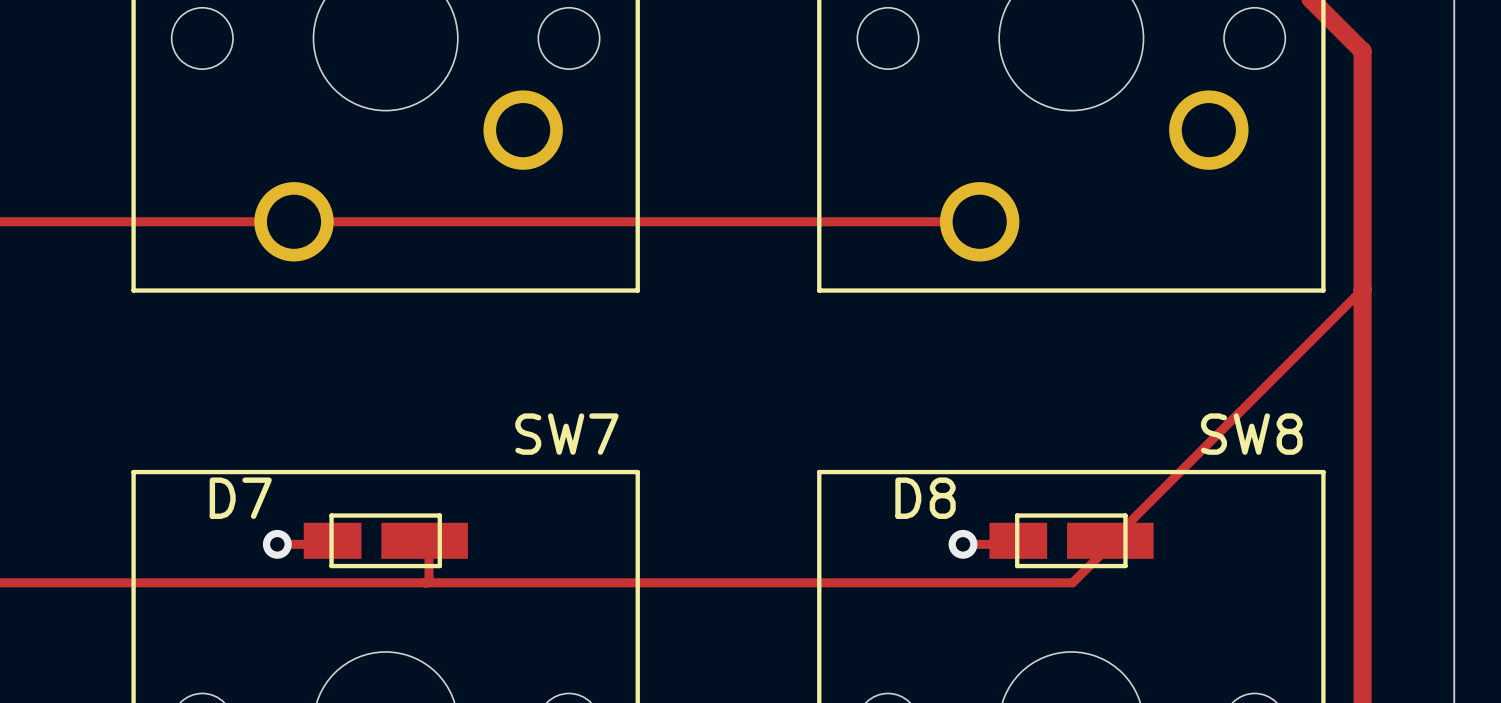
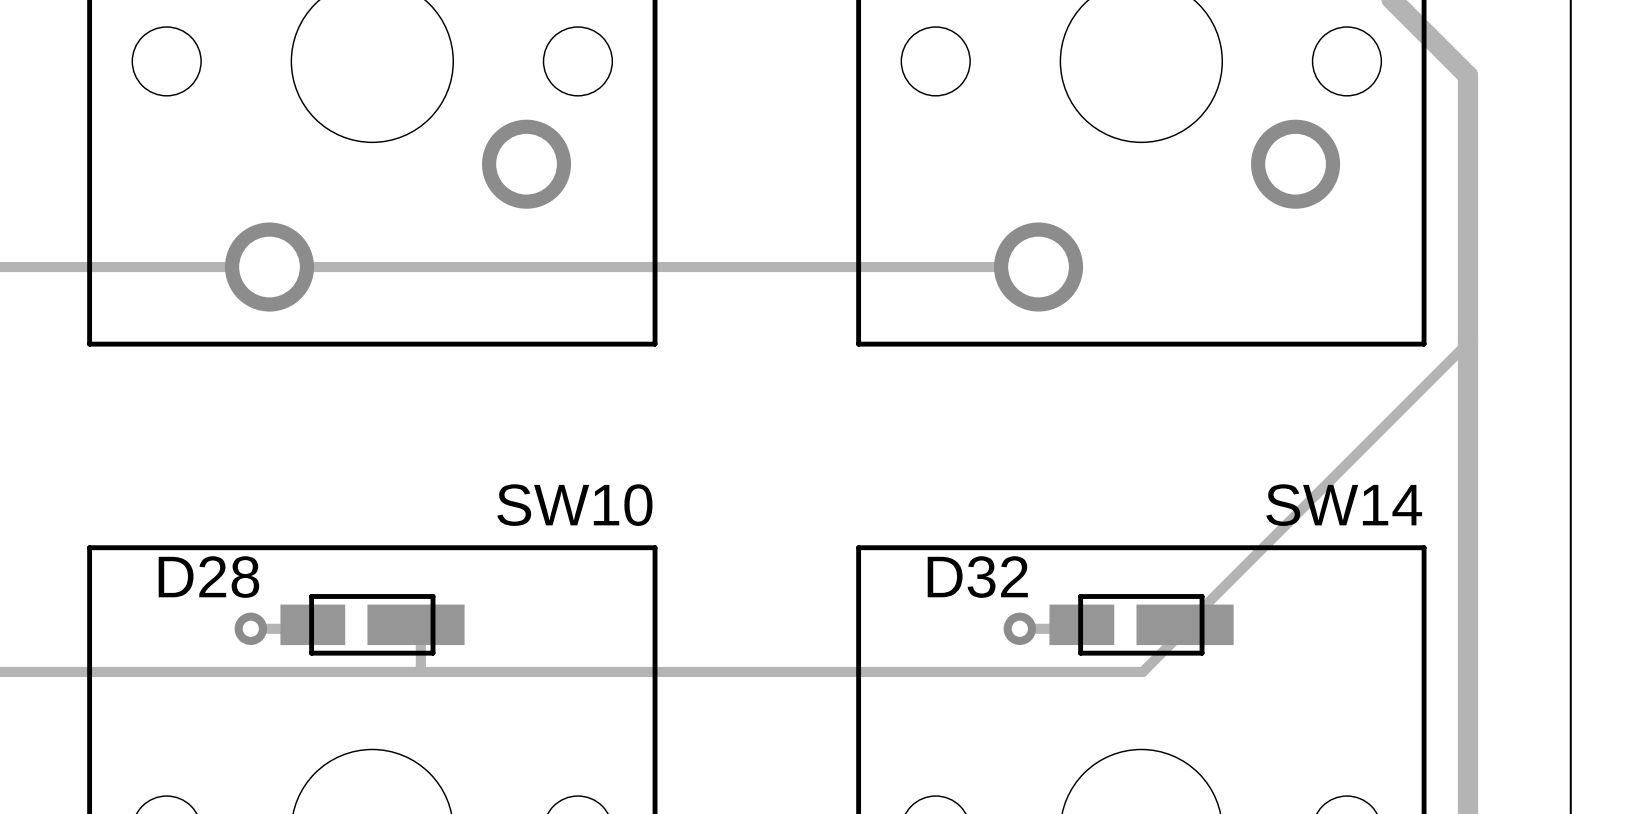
SW7 name: SW7 (566, 434) -> SW10 (574, 505)
SW8 name: SW8 (1251, 434) -> SW14 (1344, 505)
D7 name: D7 (240, 498) -> D28 (208, 577)
D8 name: D8 (925, 498) -> D32 (977, 577)

